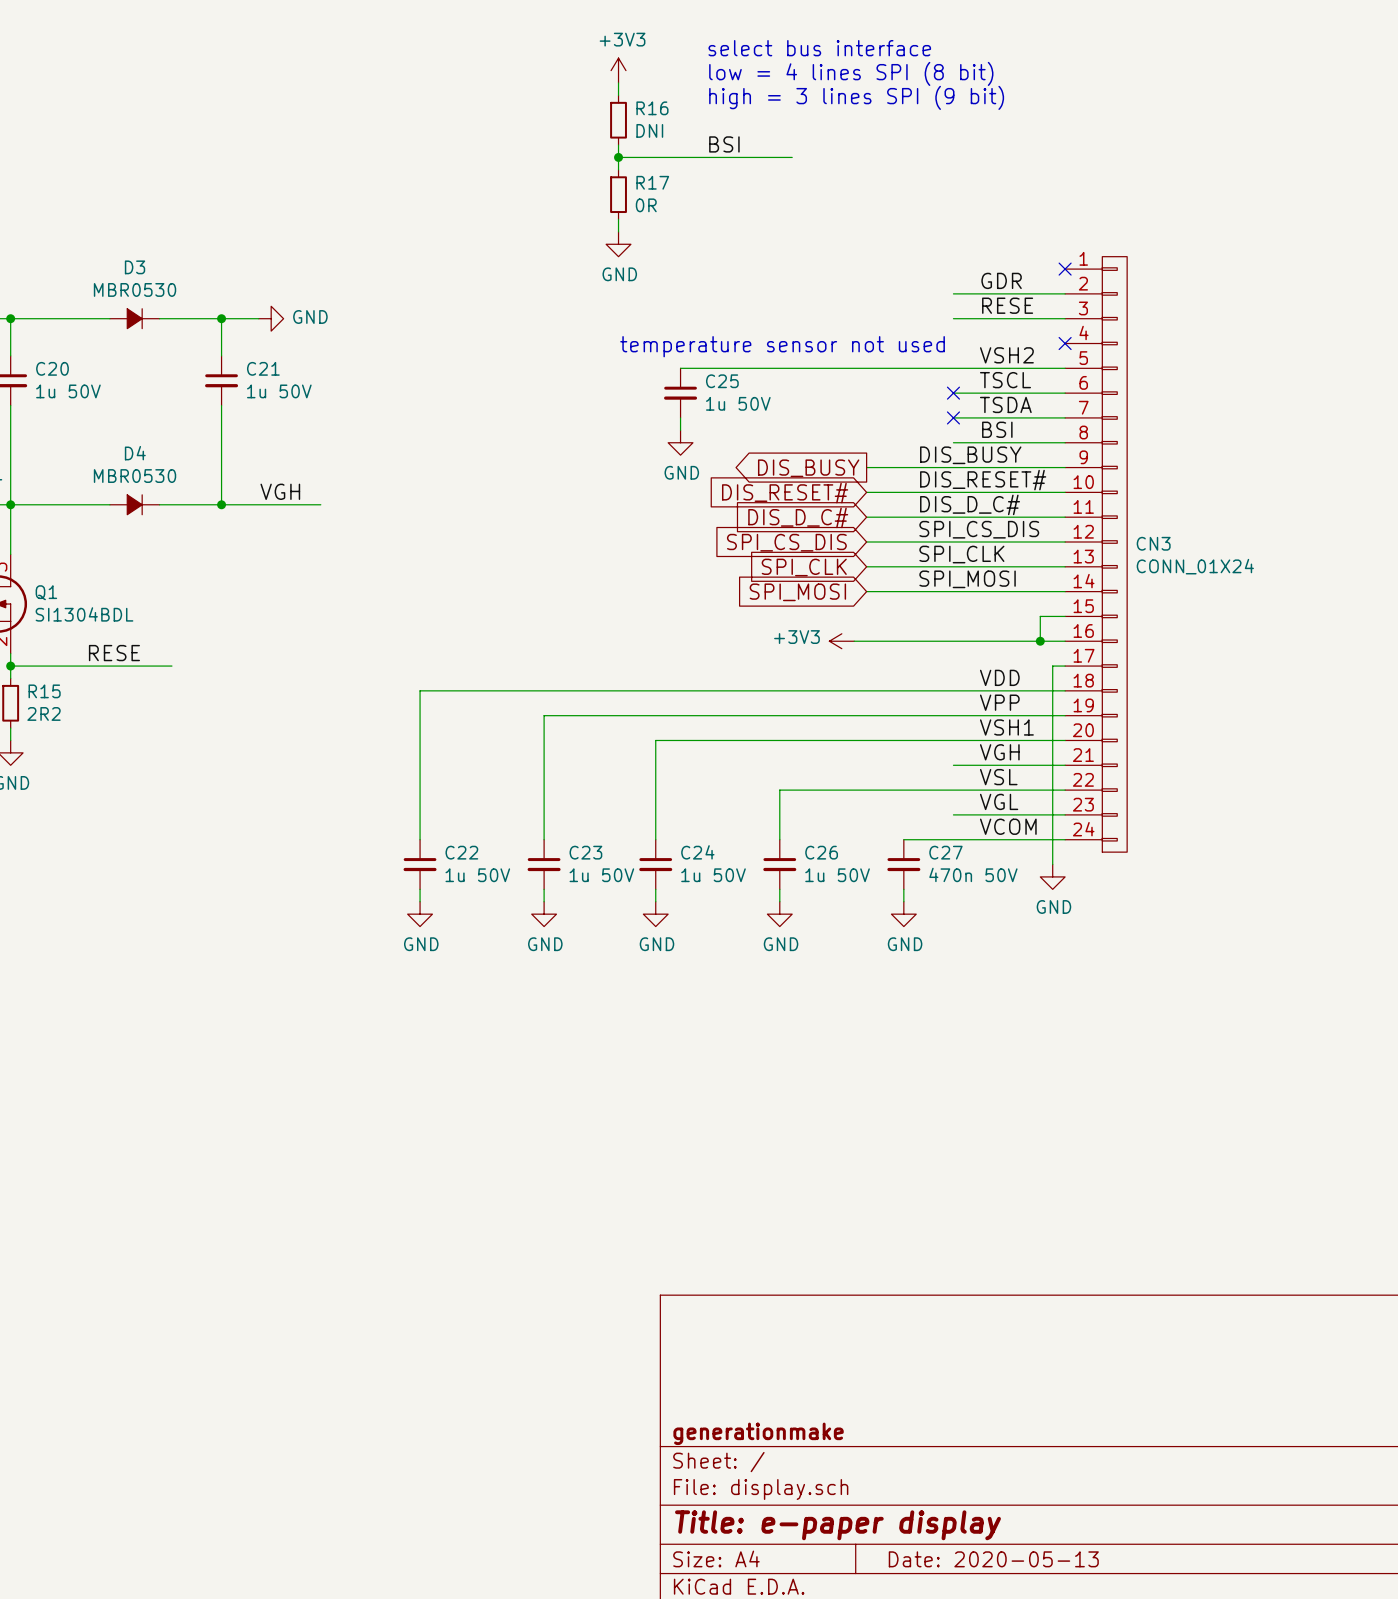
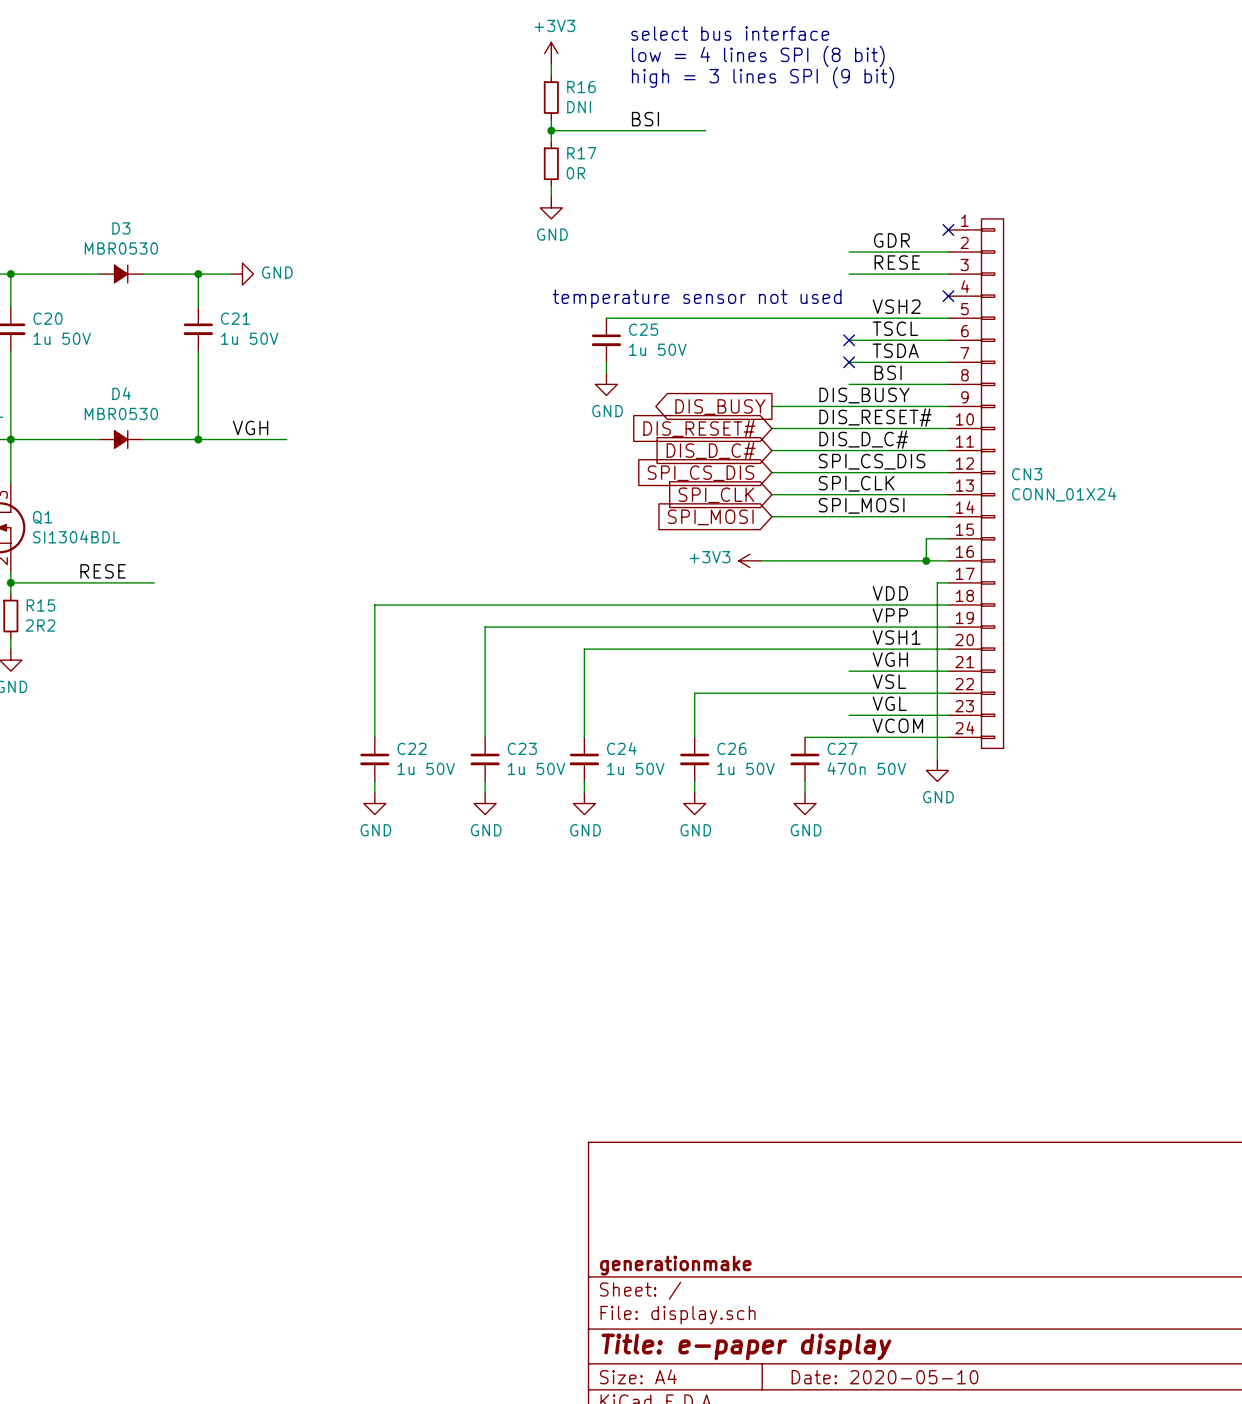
title block: Date: 2020-05-13 (993, 1559) -> Date: 2020-05-10 (884, 1377)

